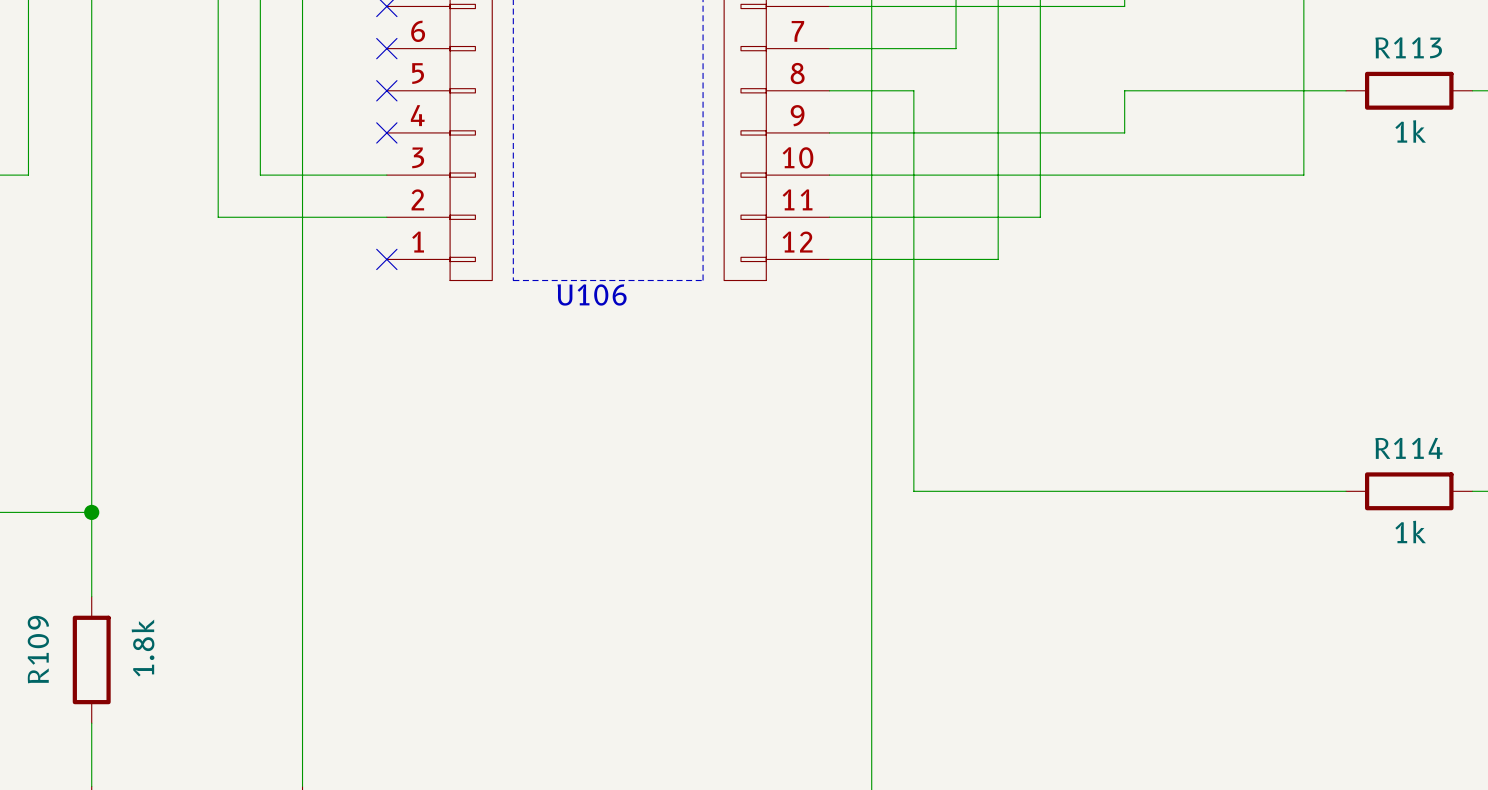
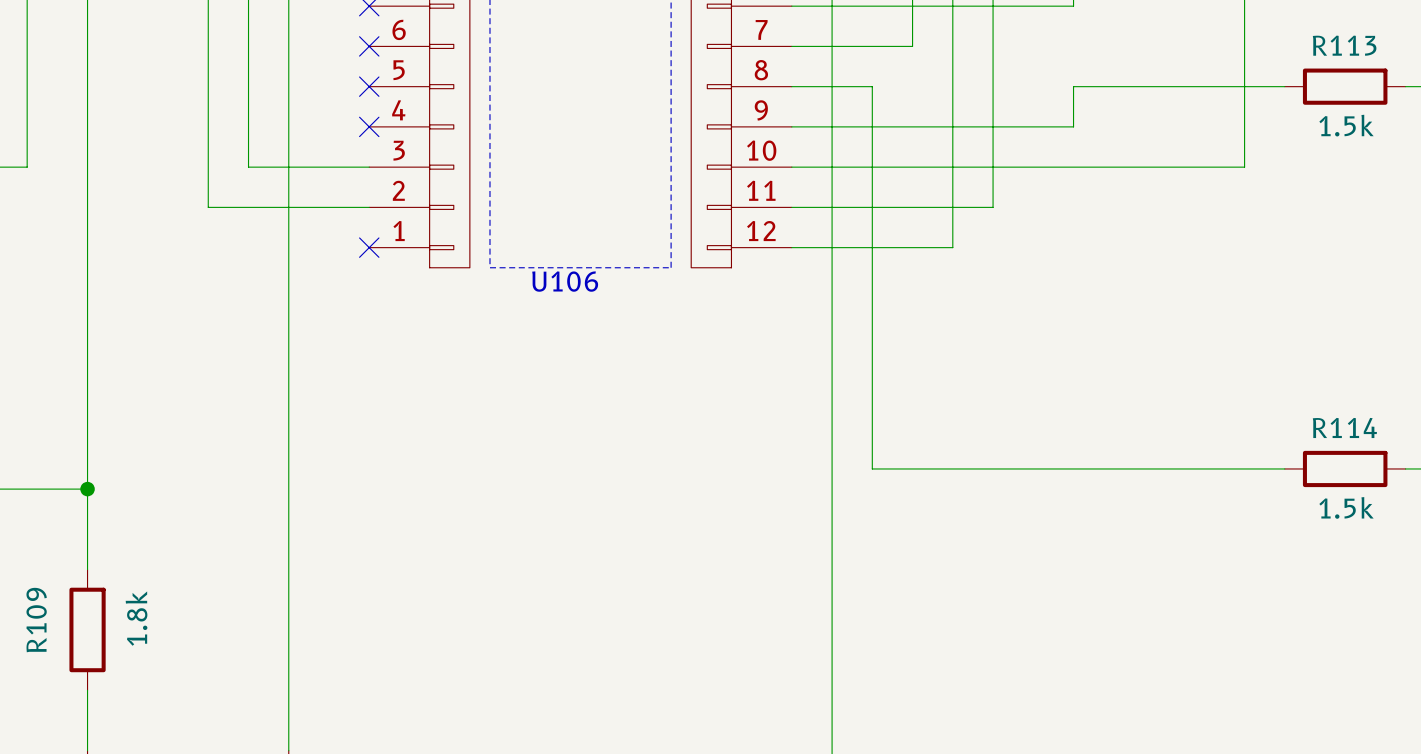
R113 value: 1k (1410, 131) -> 1.5k (1346, 125)
R114 value: 1k (1410, 532) -> 1.5k (1346, 507)

